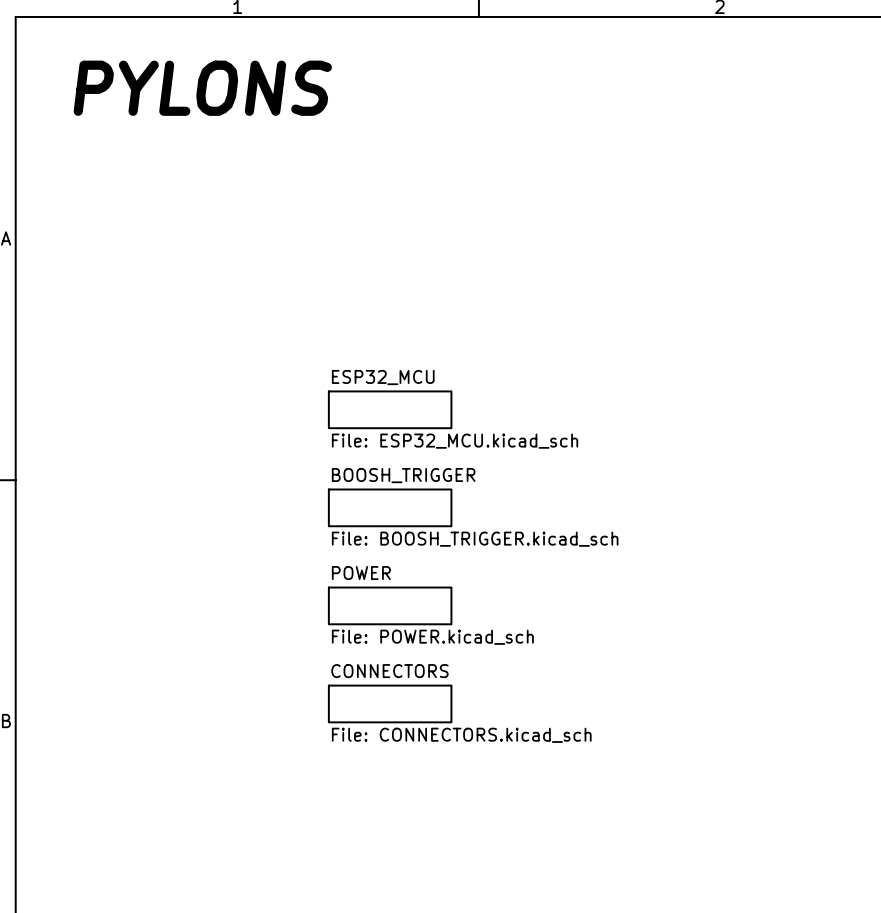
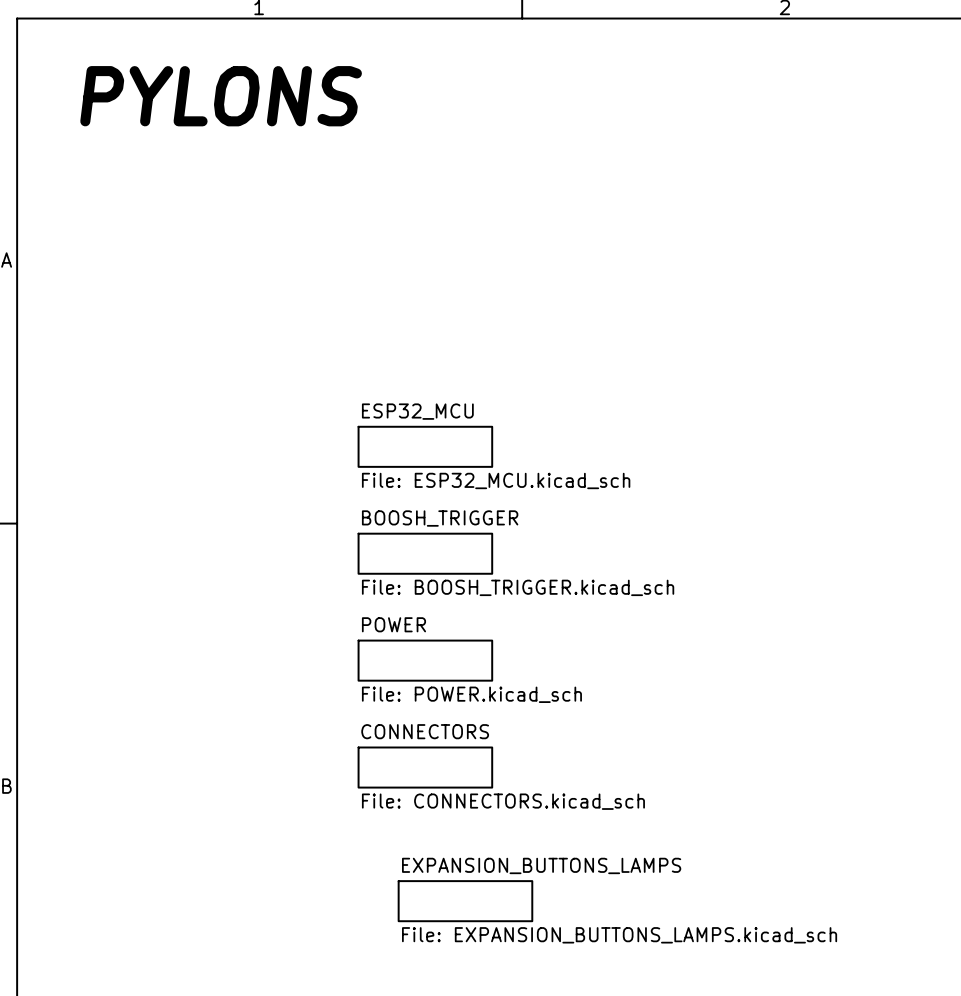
sheet EXPANSION_BUTTONS_LAMPS: none -> File: EXPANSION_BUTTONS_LAMPS.kicad_sch (465, 901)

